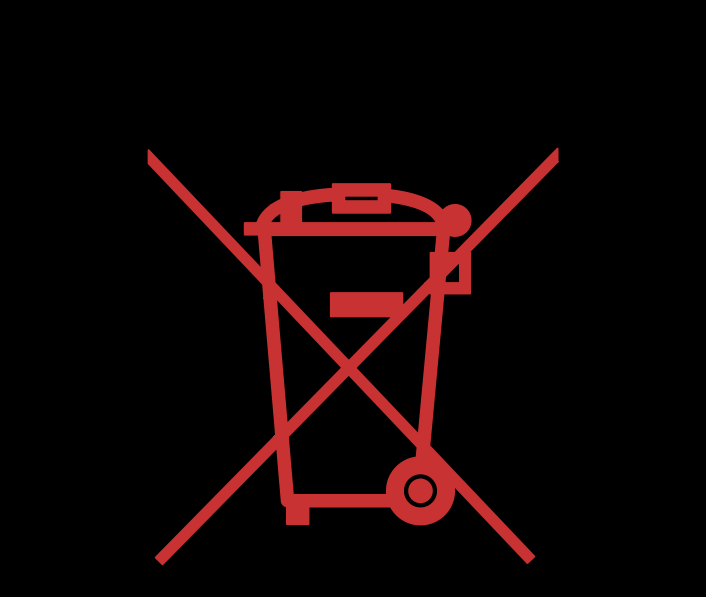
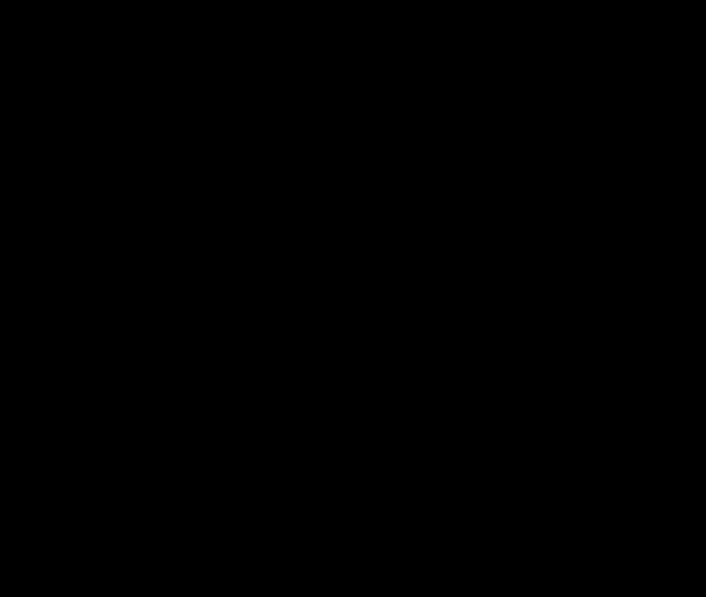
part: (353, 356) -> none

